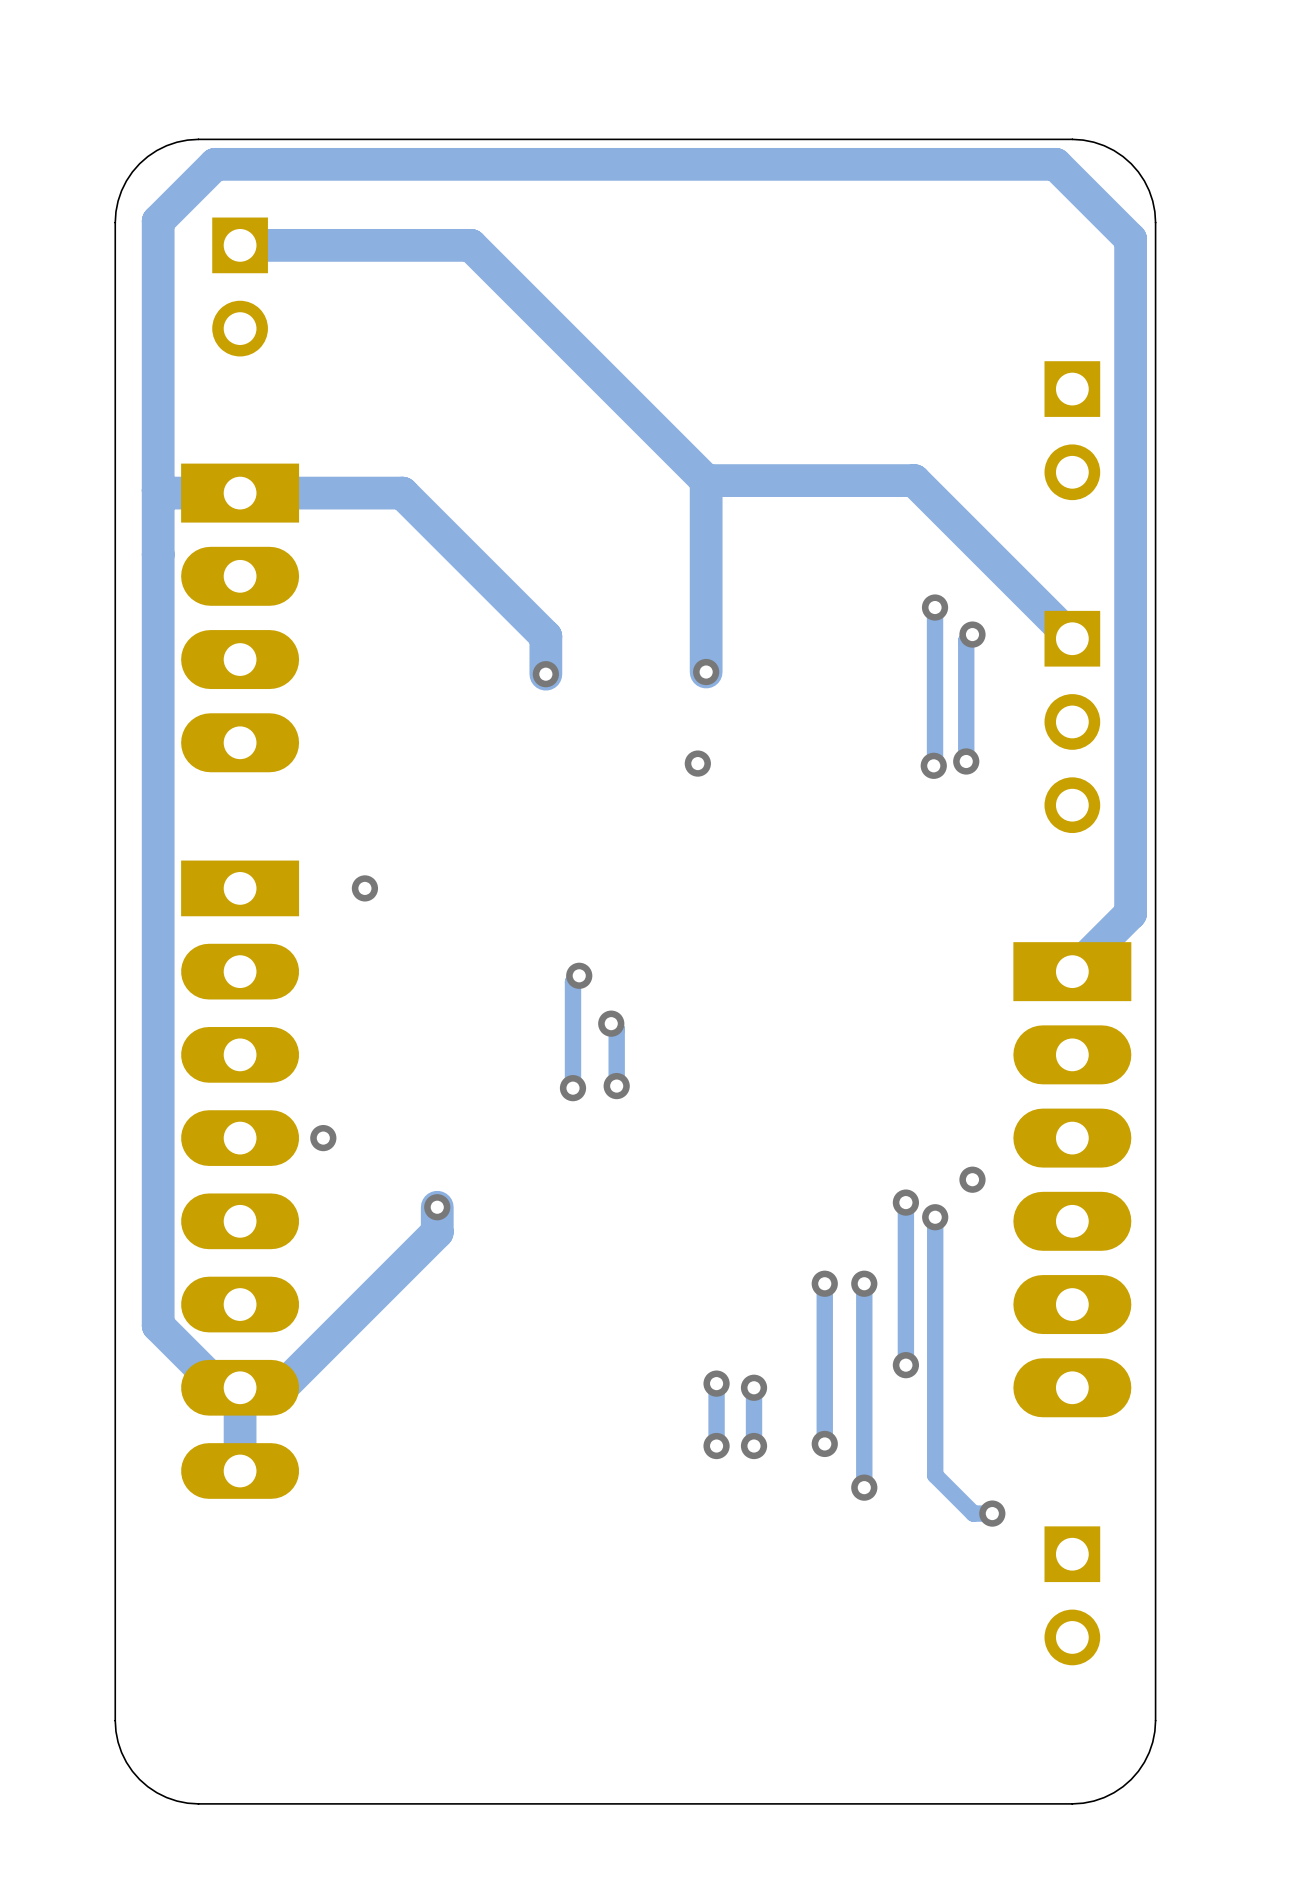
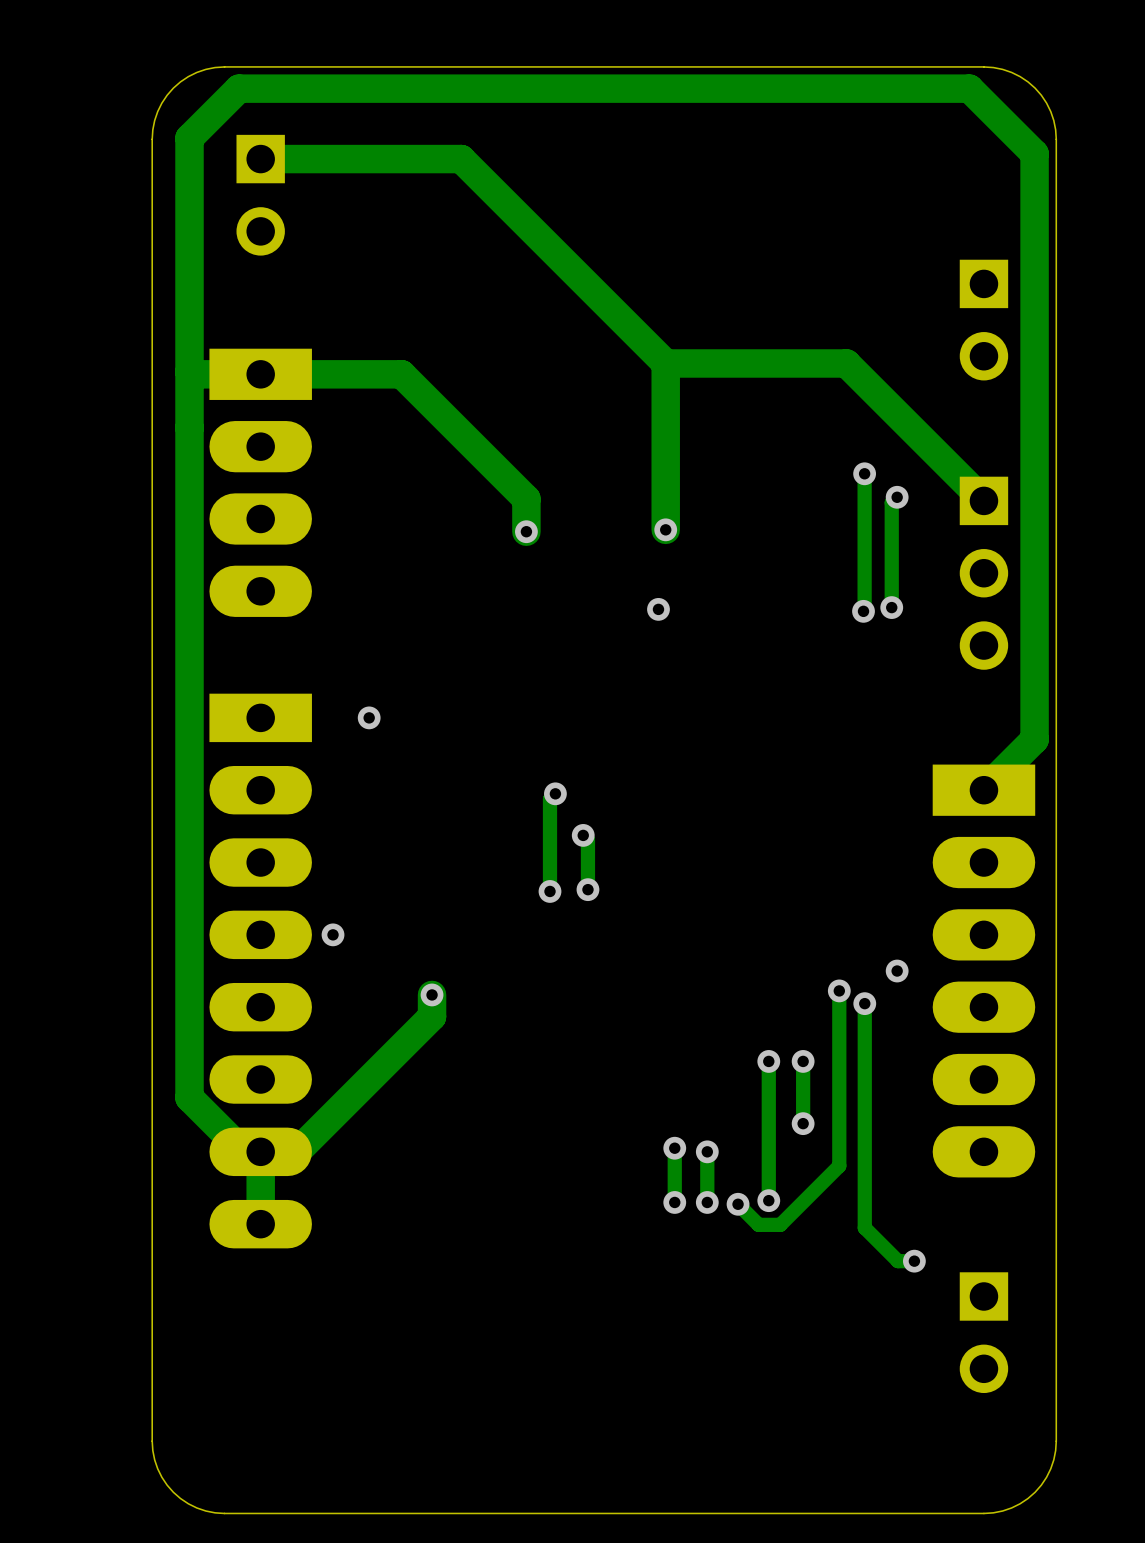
track: (864, 1355) (864, 1487) -> none
track: none -> (839, 1132) (839, 1165) (780, 1224) (758, 1224) (738, 1204)
via position: (905, 1365) -> (803, 1123)
via: none -> (738, 1204)
via: (864, 1487) -> none

